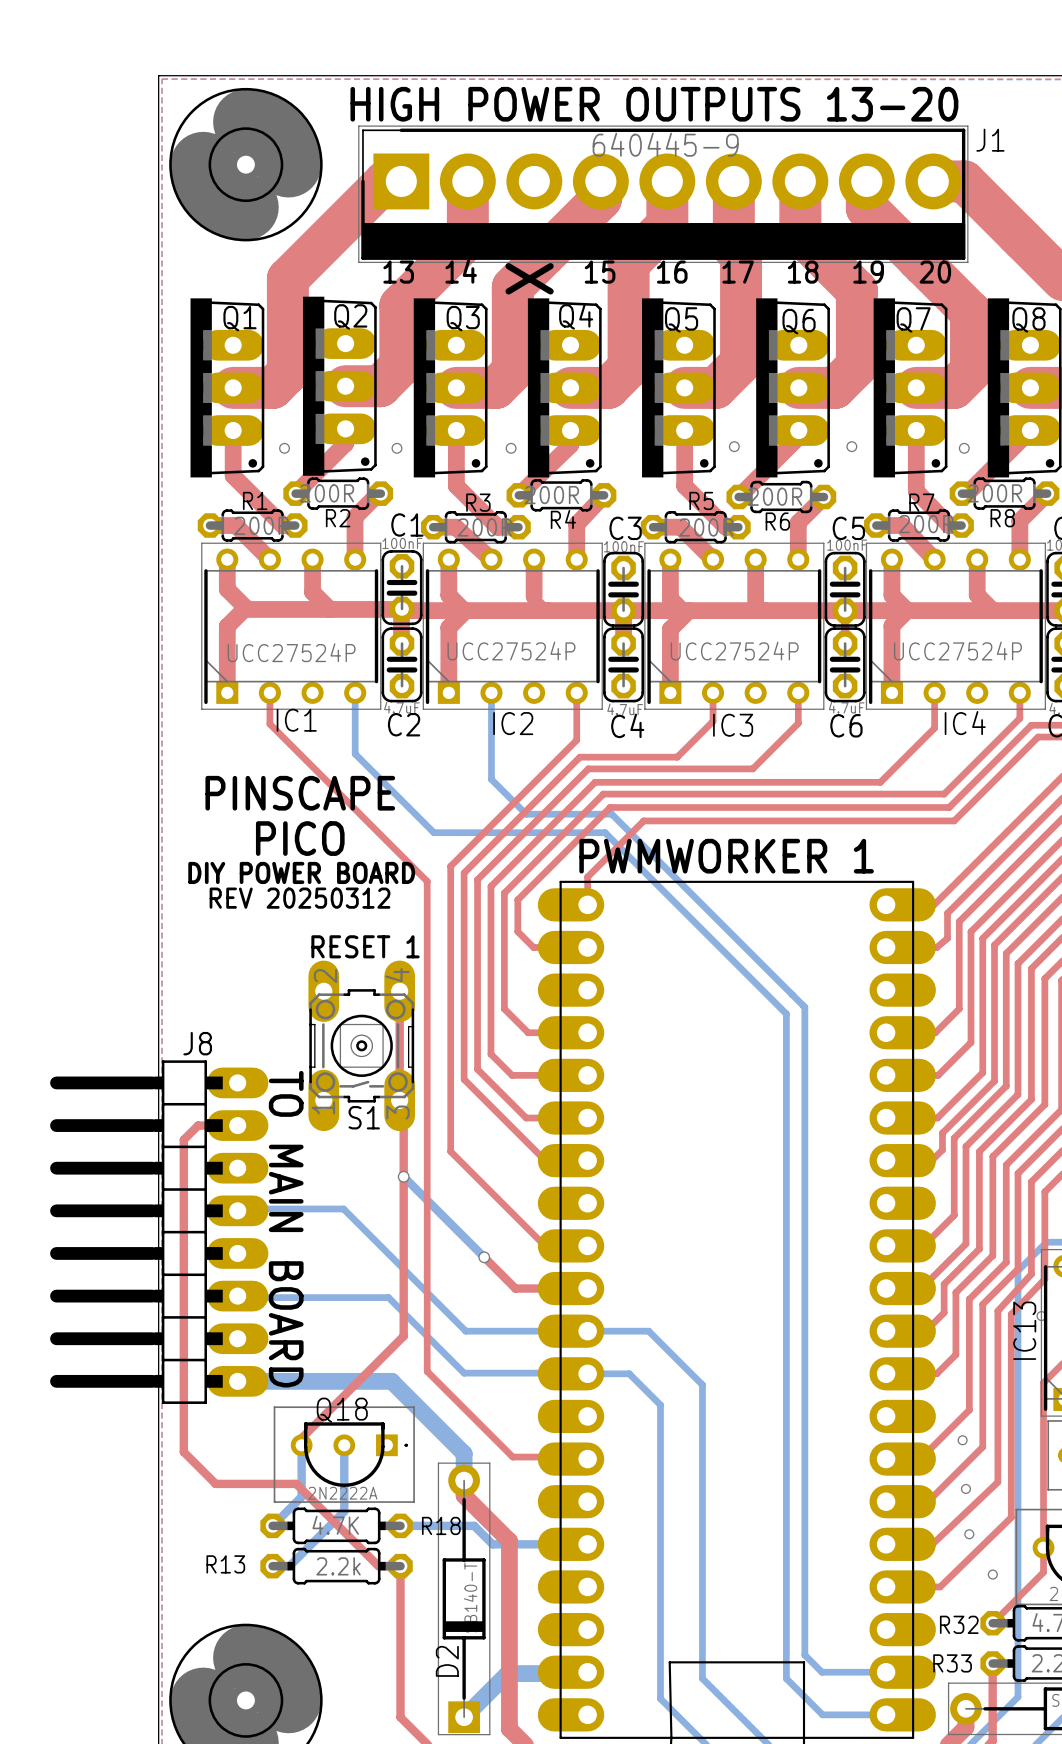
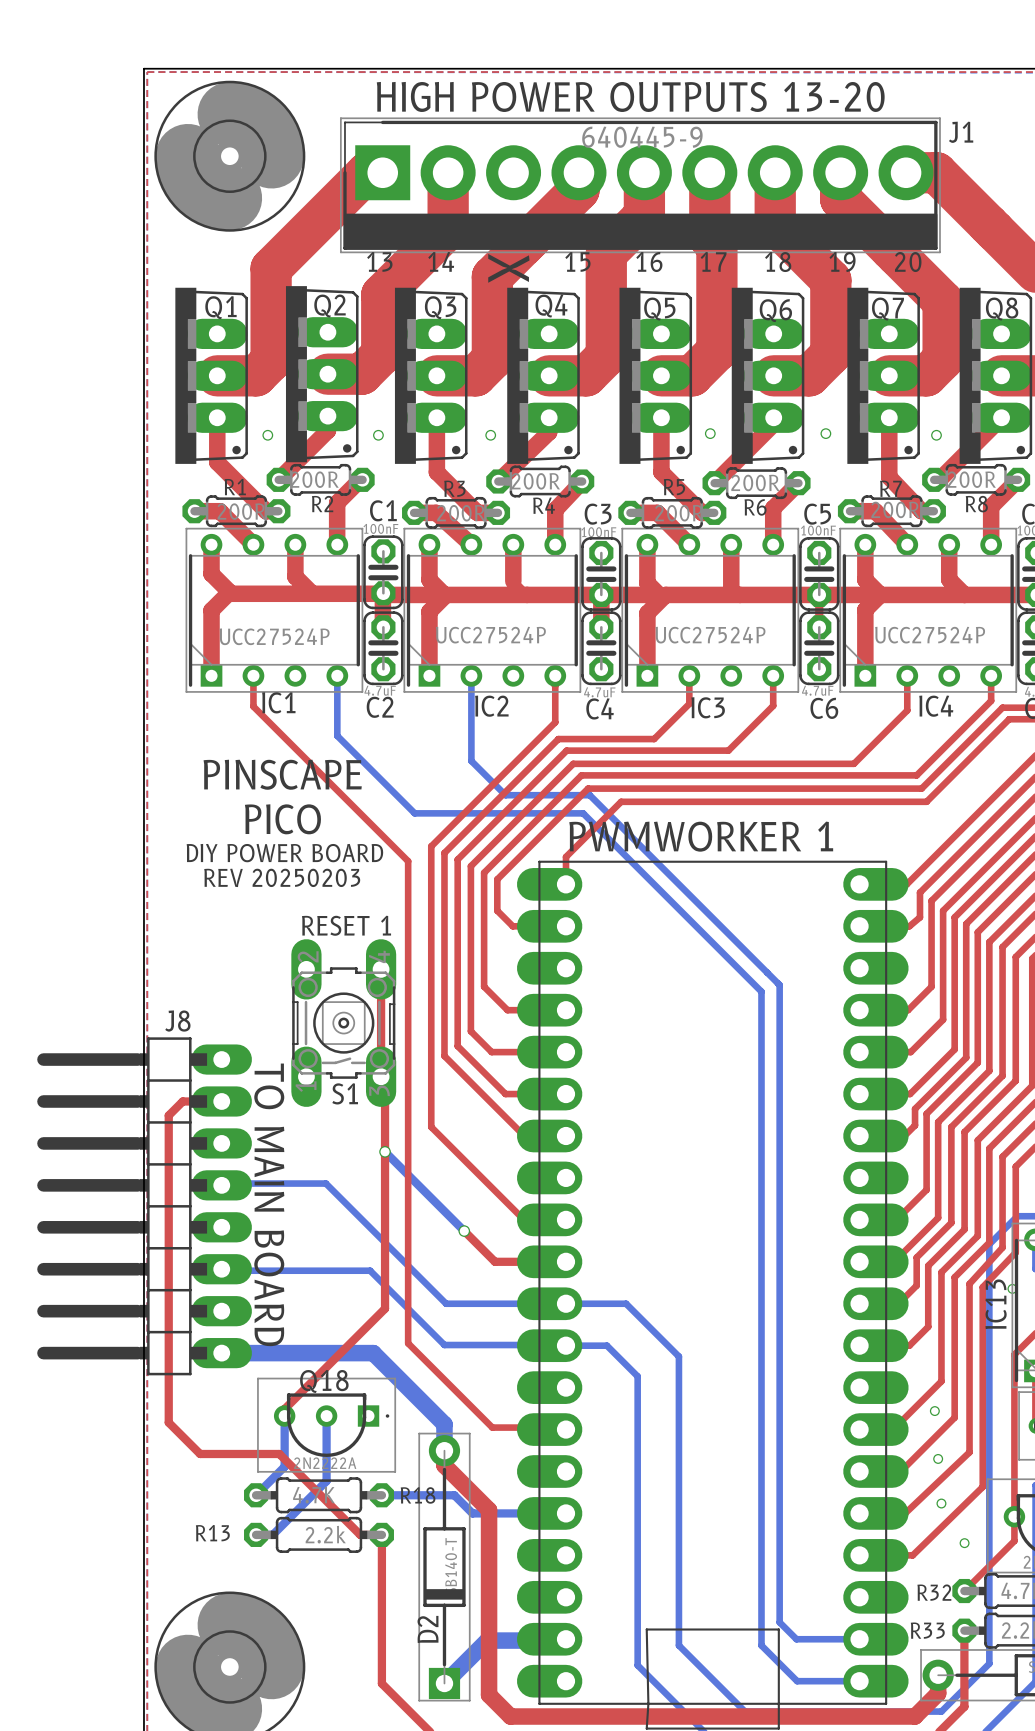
text: REV 20250312 (300, 898) -> REV 20250203 (282, 877)

